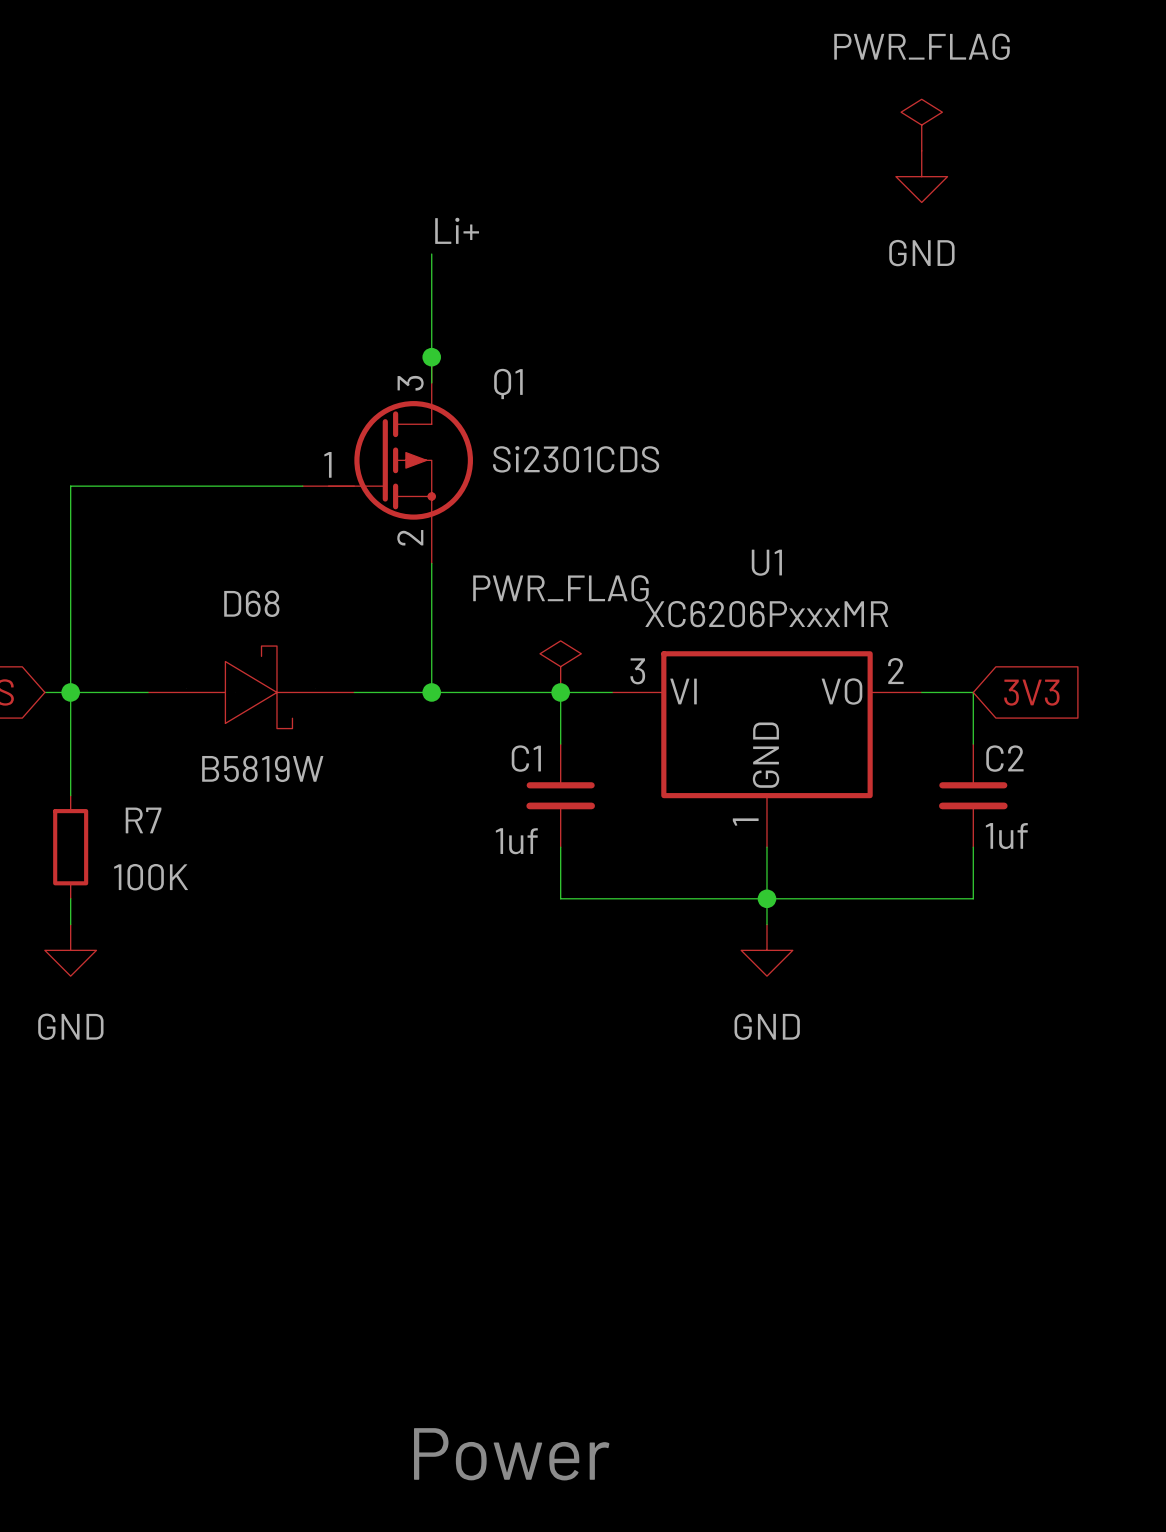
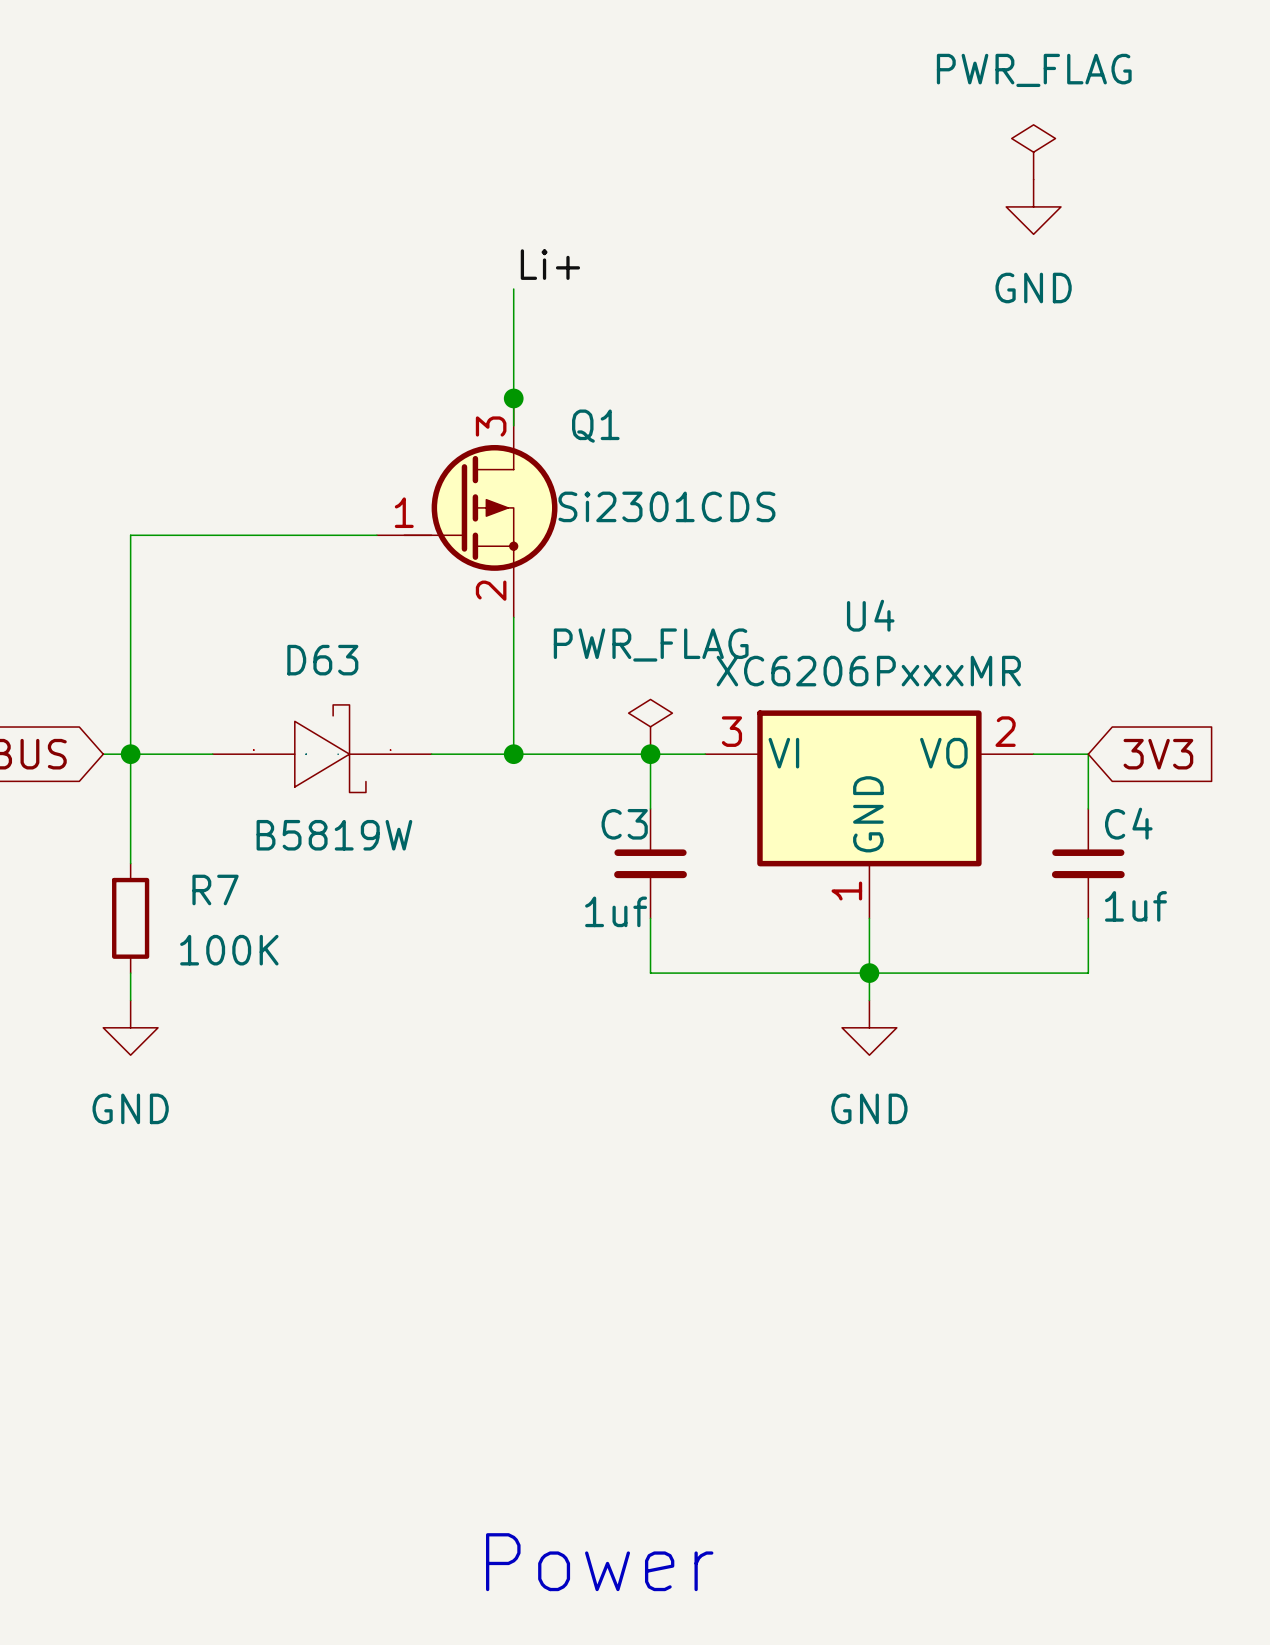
U1 name: U1 (766, 562) -> U4 (870, 615)
D68 name: D68 (251, 603) -> D63 (322, 660)
C1 name: C1 (526, 758) -> C3 (624, 824)
C2 name: C2 (1004, 758) -> C4 (1128, 823)

